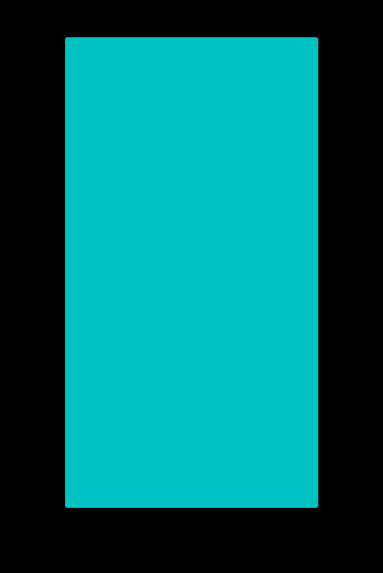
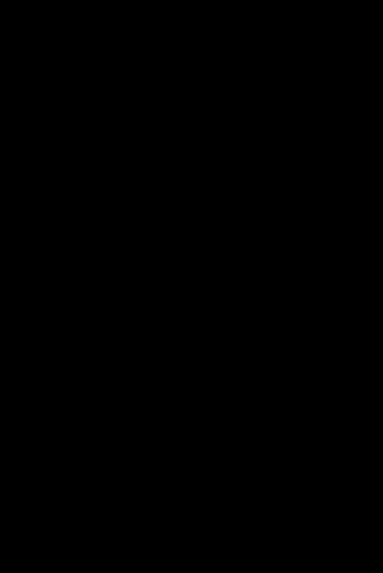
drawing: [65, 37, 319, 508] -> none

